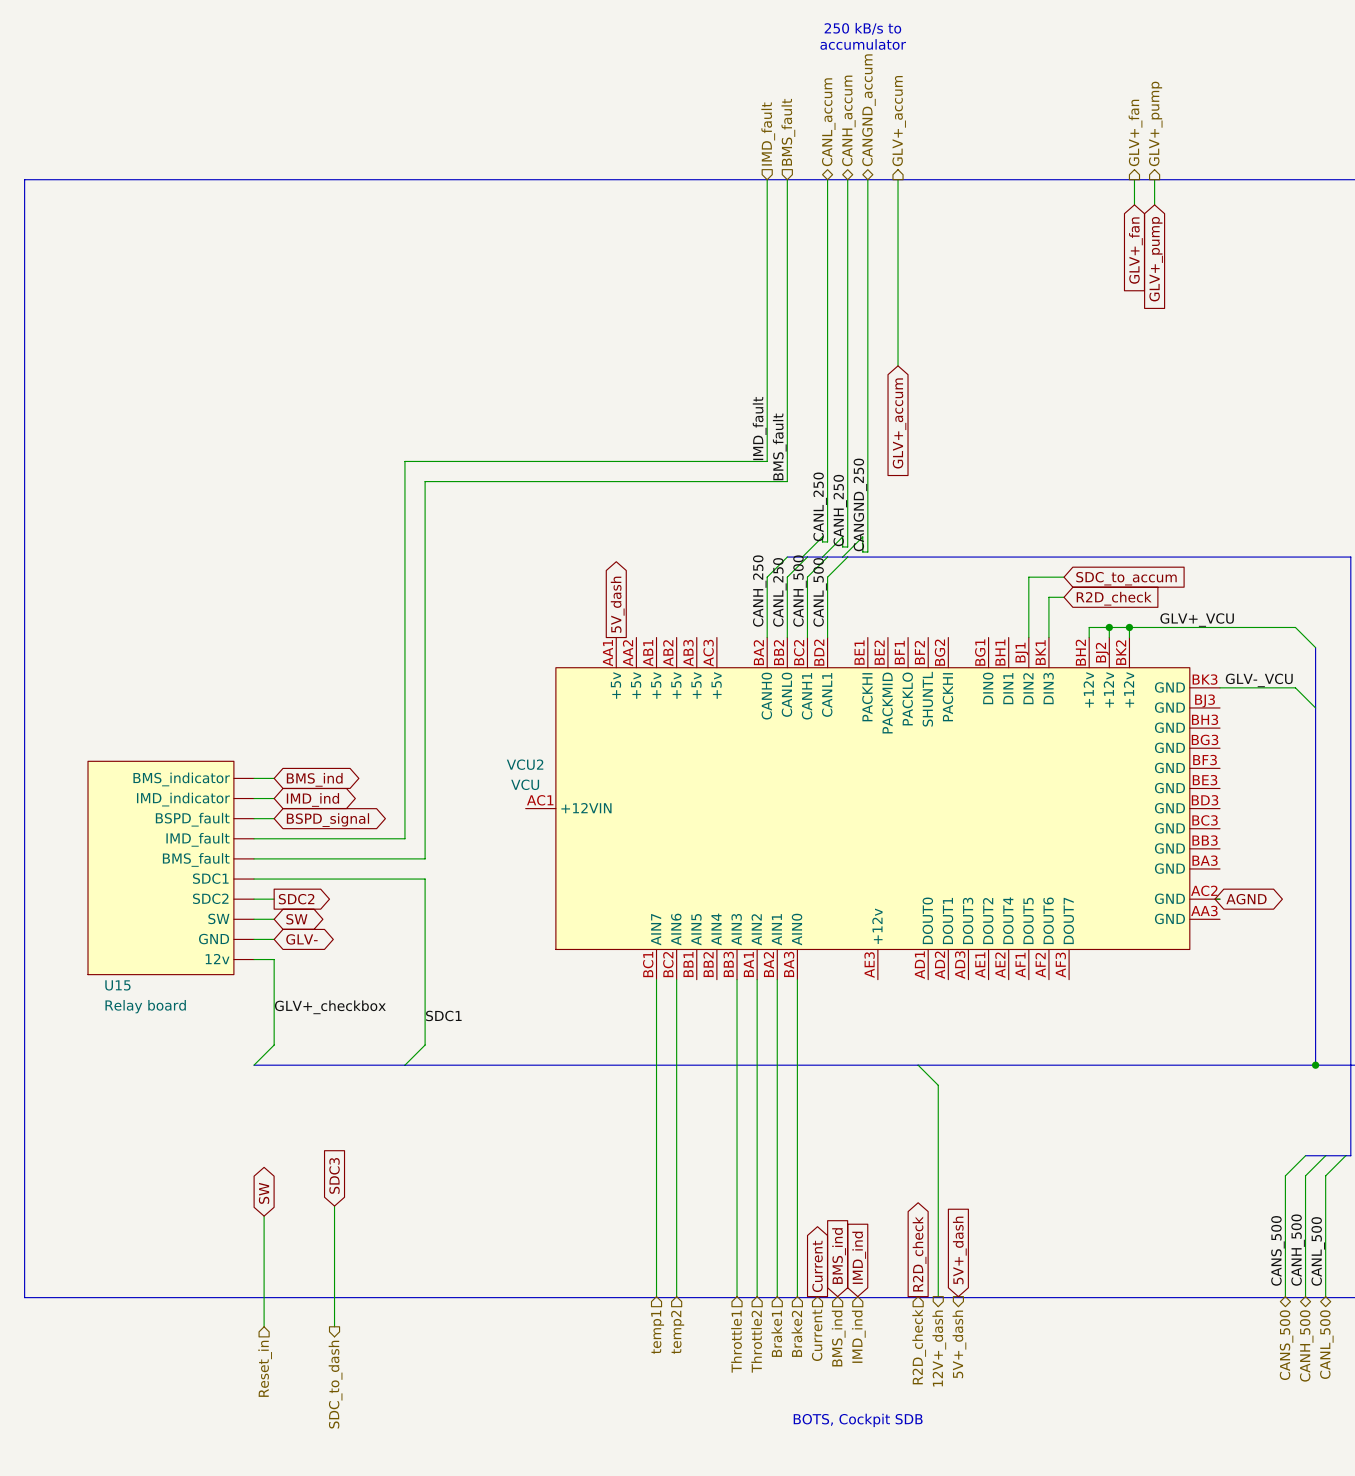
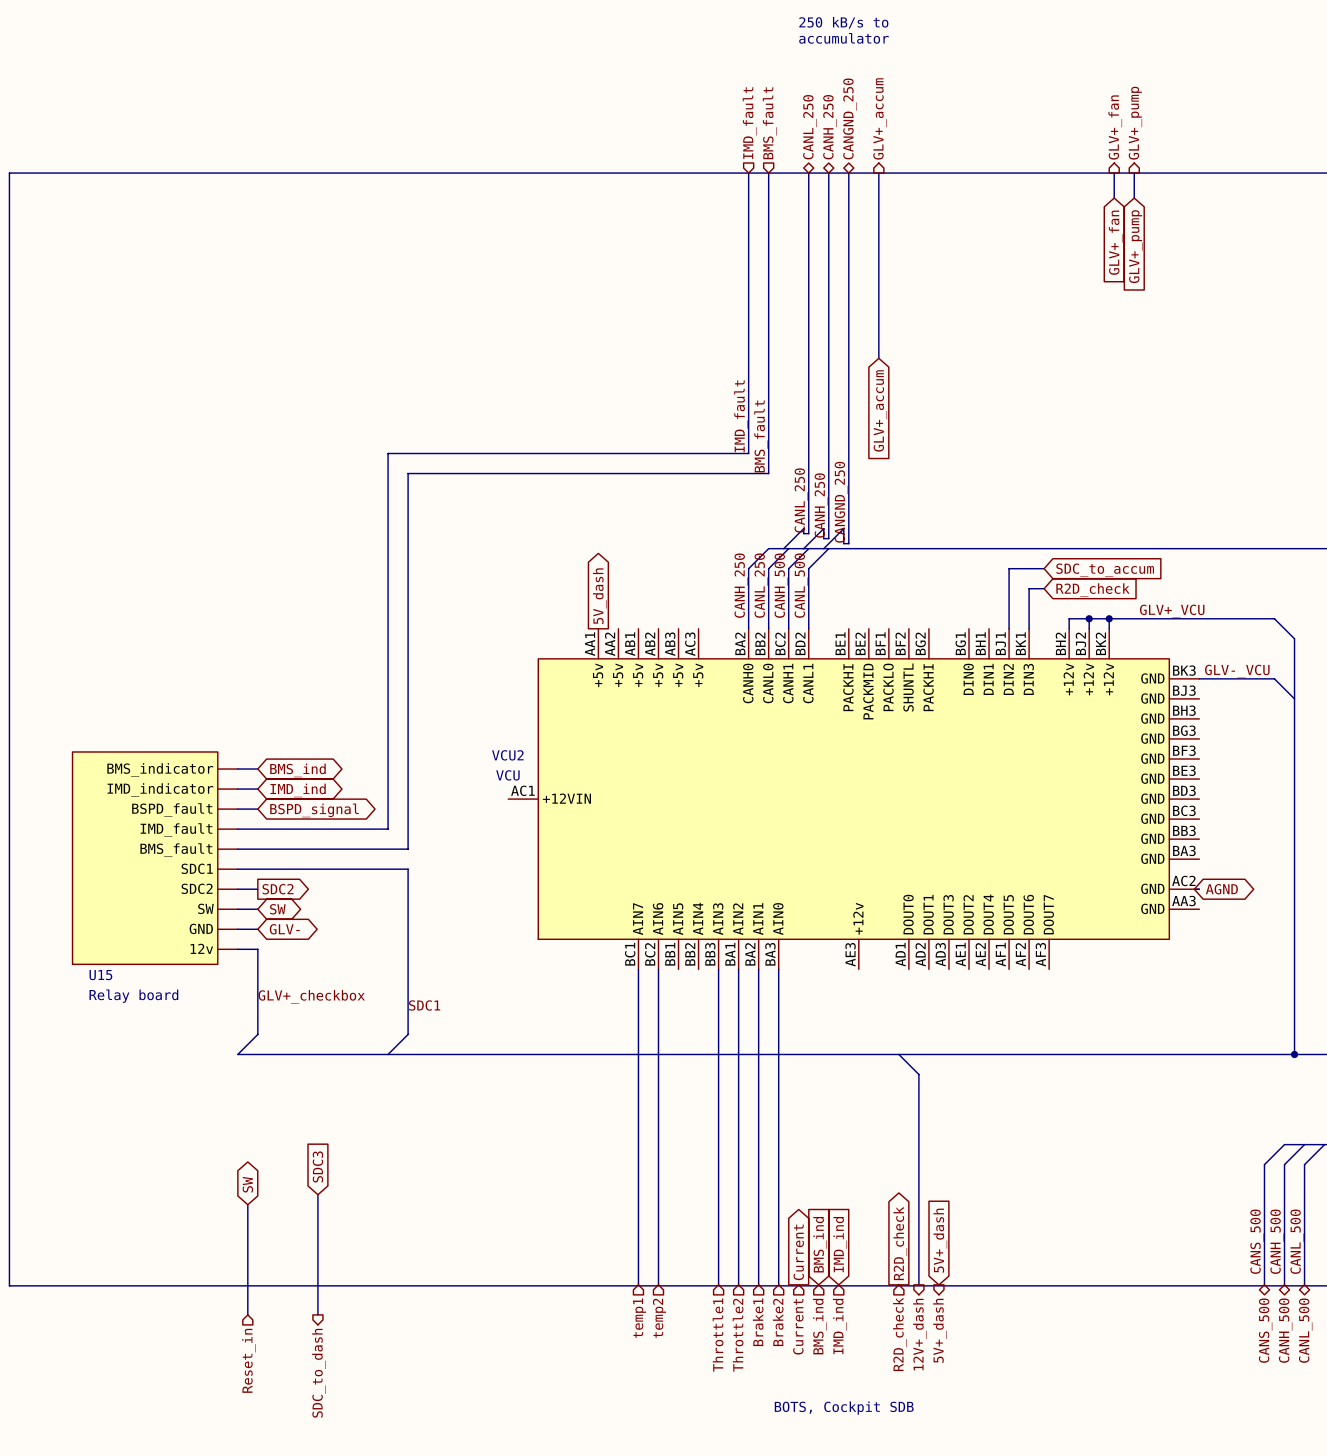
hierarchical label: CANGND_accum (868, 110) -> CANGND_250 (849, 118)
hierarchical label: CANH_accum (848, 120) -> CANH_250 (829, 127)
hierarchical label: CANL_accum (828, 122) -> CANL_250 (809, 127)

